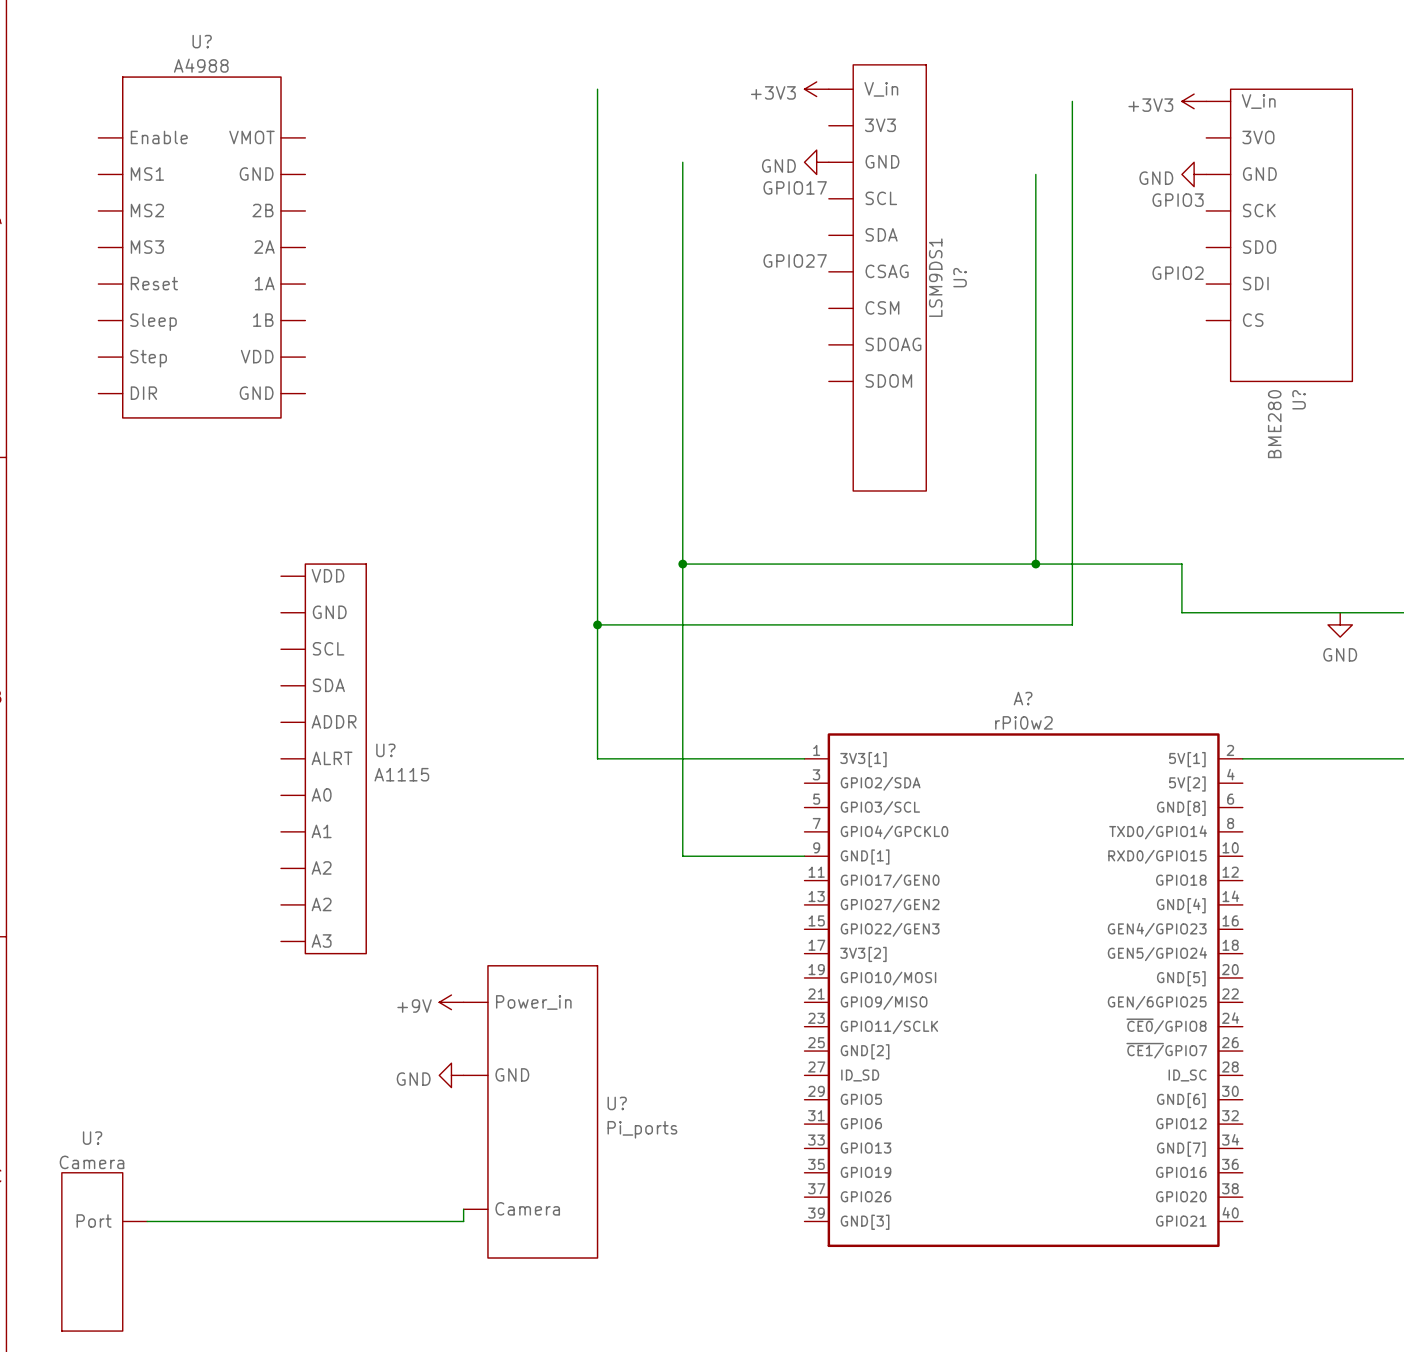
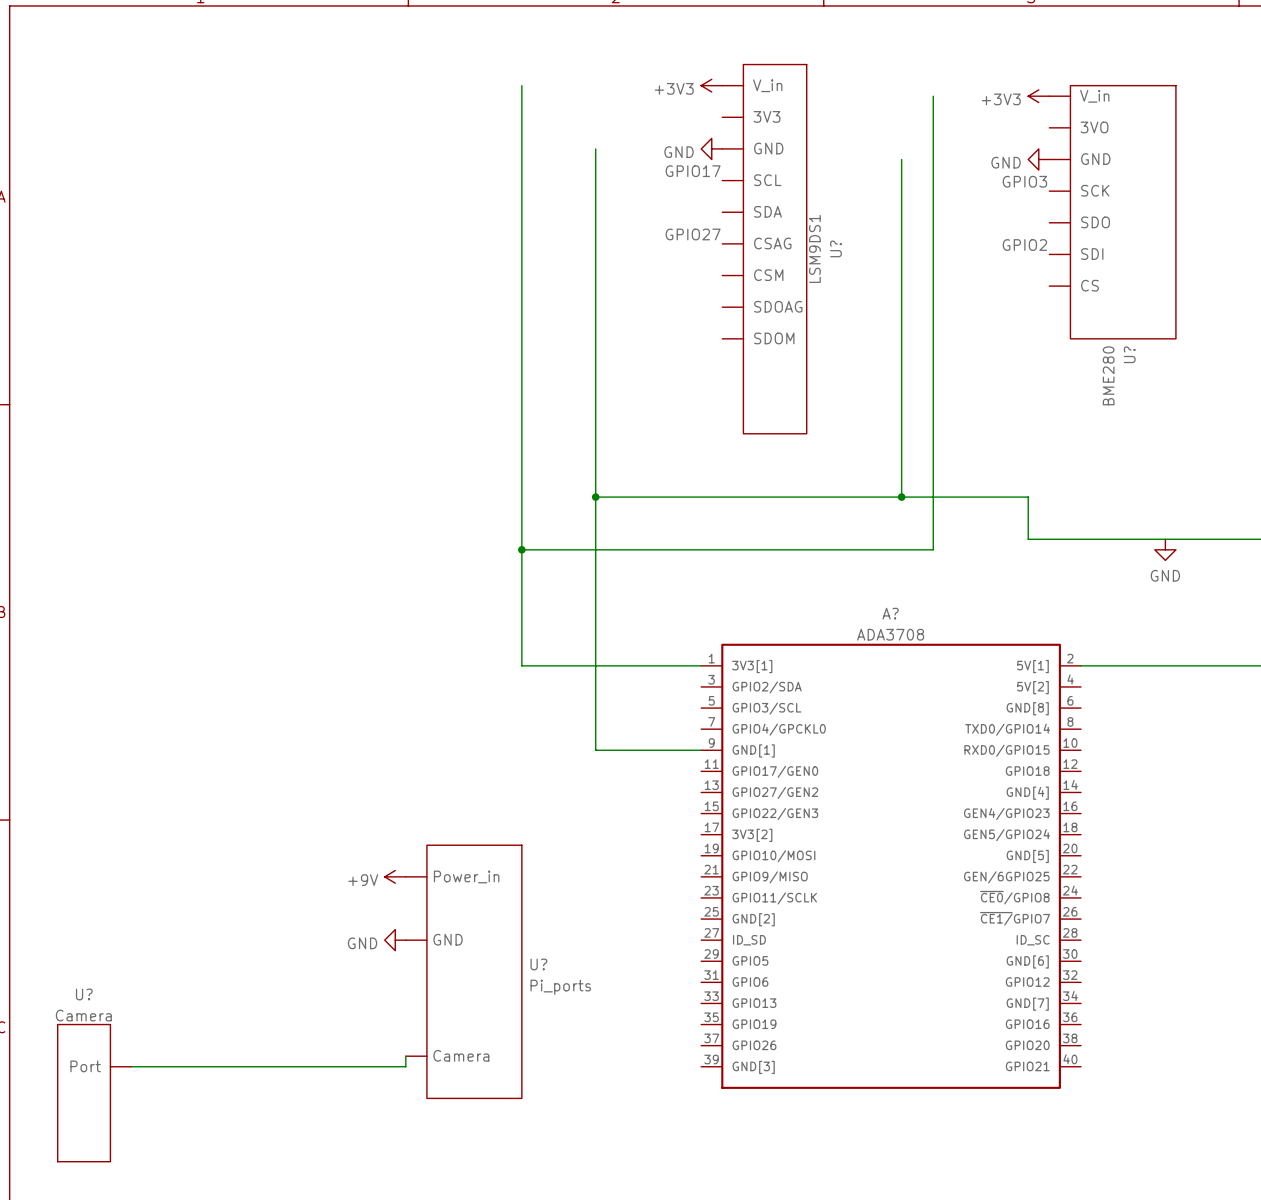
U?: A4988 (201, 247) -> none
A? value: rPi0w2 (1023, 722) -> ADA3708 (890, 634)
U?: A1115 (323, 758) -> none

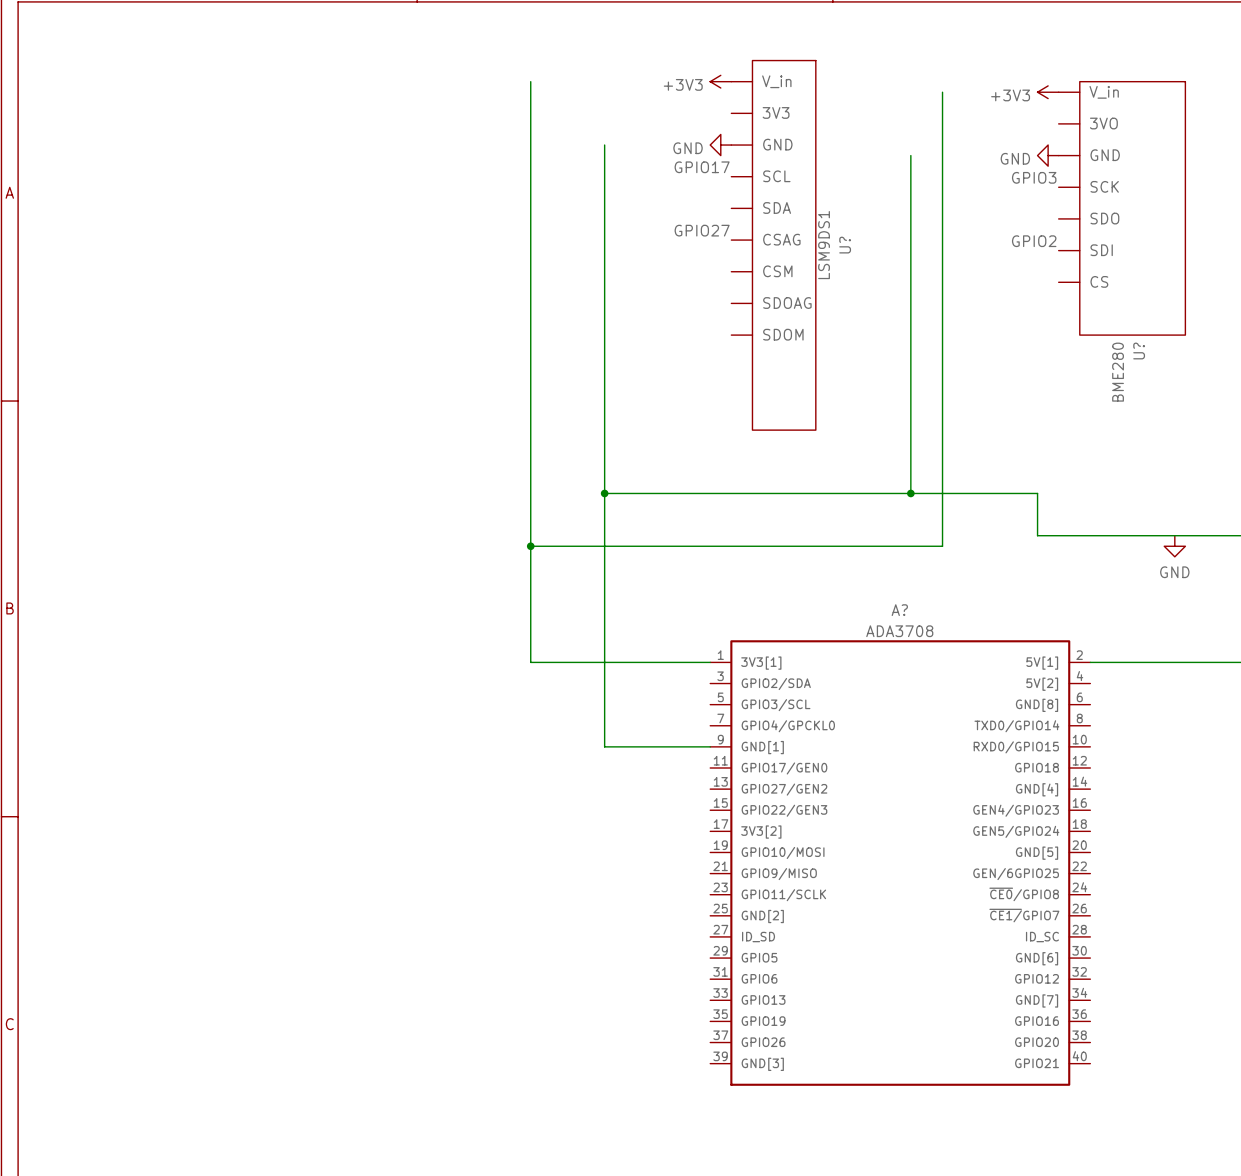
power symbol: +9V (395, 876) -> none
power symbol: GND (395, 940) -> none
U?: Pi_ports (464, 971) -> none
wire: (405, 1056) (405, 1066) (131, 1066) -> none
U?: Camera (94, 1093) -> none

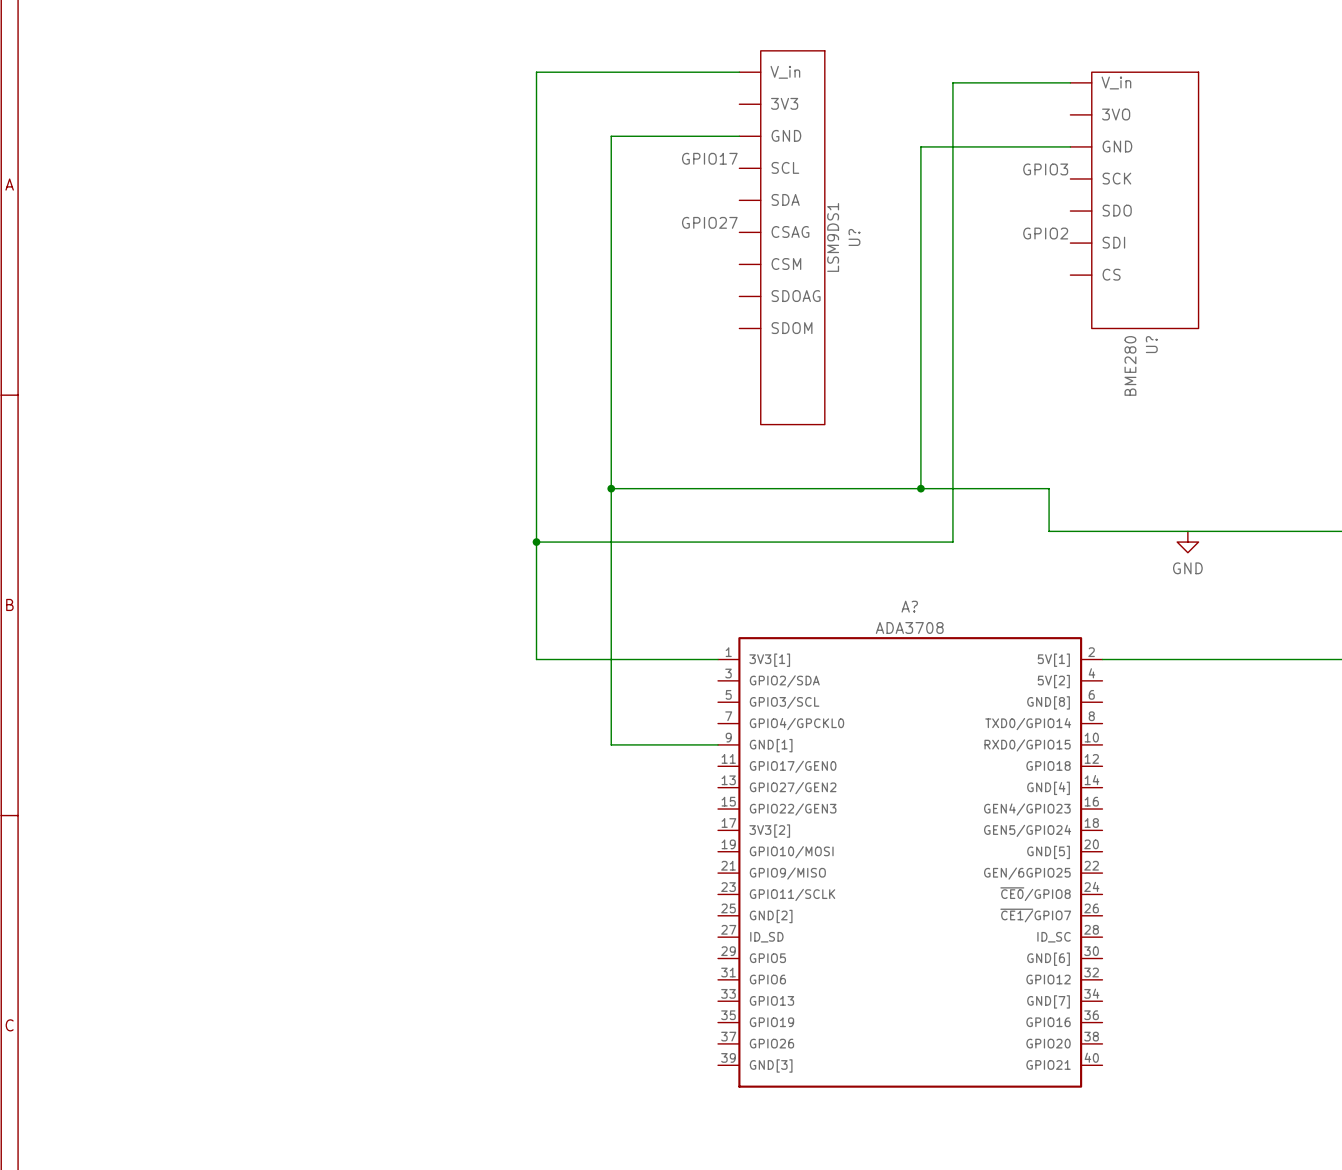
wire: none -> (536, 72) (739, 72)
power symbol: +3V3 (720, 81) -> none
wire: none -> (952, 82) (1070, 82)
power symbol: +3V3 (1048, 92) -> none
wire: none -> (611, 136) (739, 136)
power symbol: GND (720, 145) -> none
wire: none -> (920, 146) (1070, 146)
power symbol: GND (1048, 155) -> none

